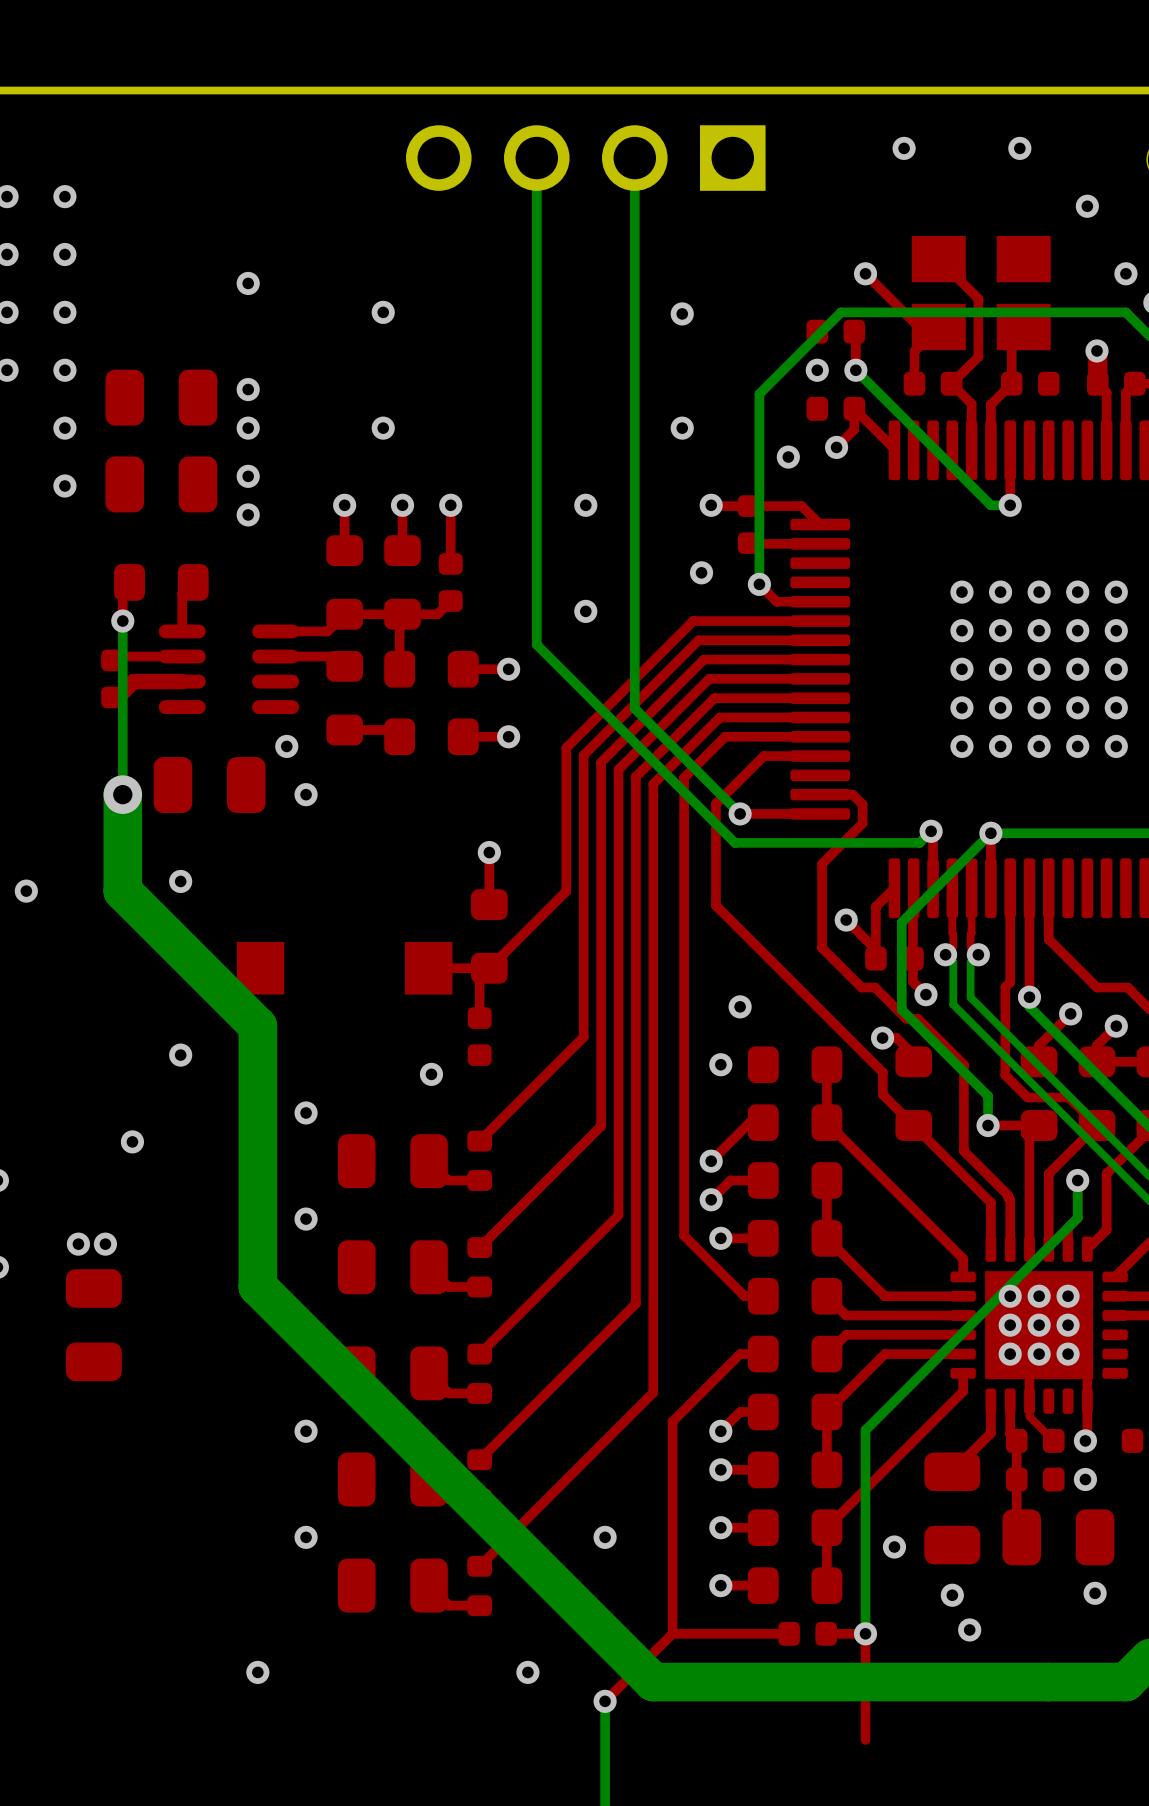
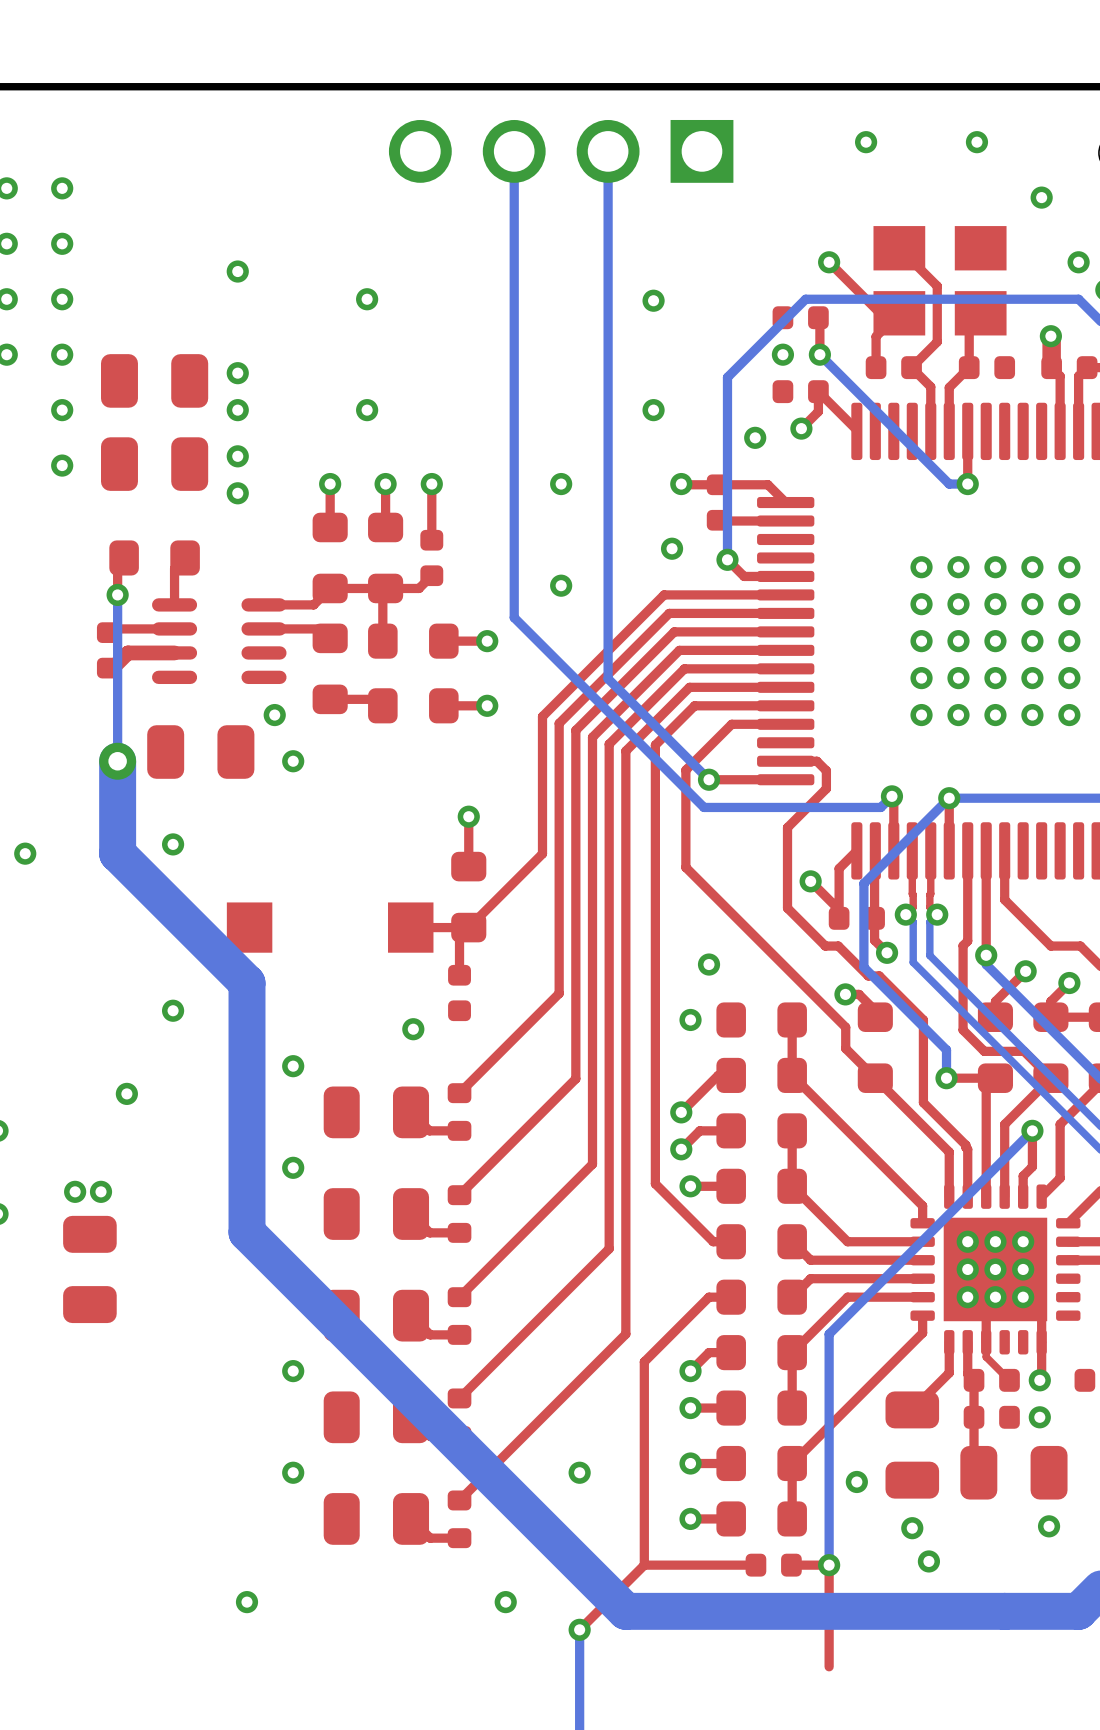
bottom track: (1077, 1180) (1077, 1218) (865, 1430) -> (1032, 1130) (829, 1334) (829, 1370)

